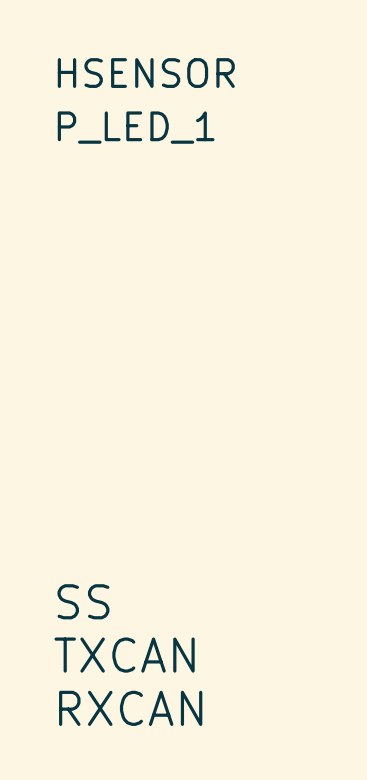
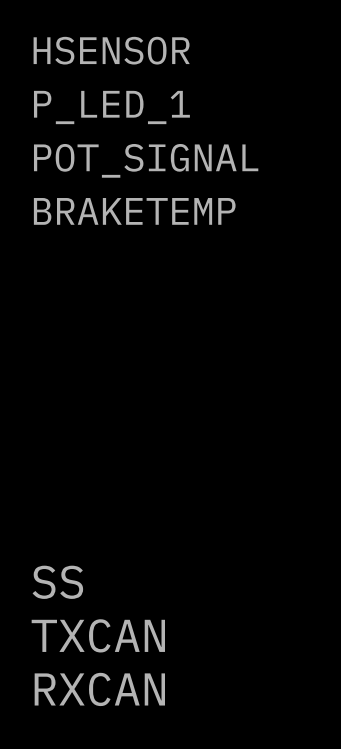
label: none -> POT_SIGNAL (146, 160)
label: none -> BRAKETEMP (134, 211)

